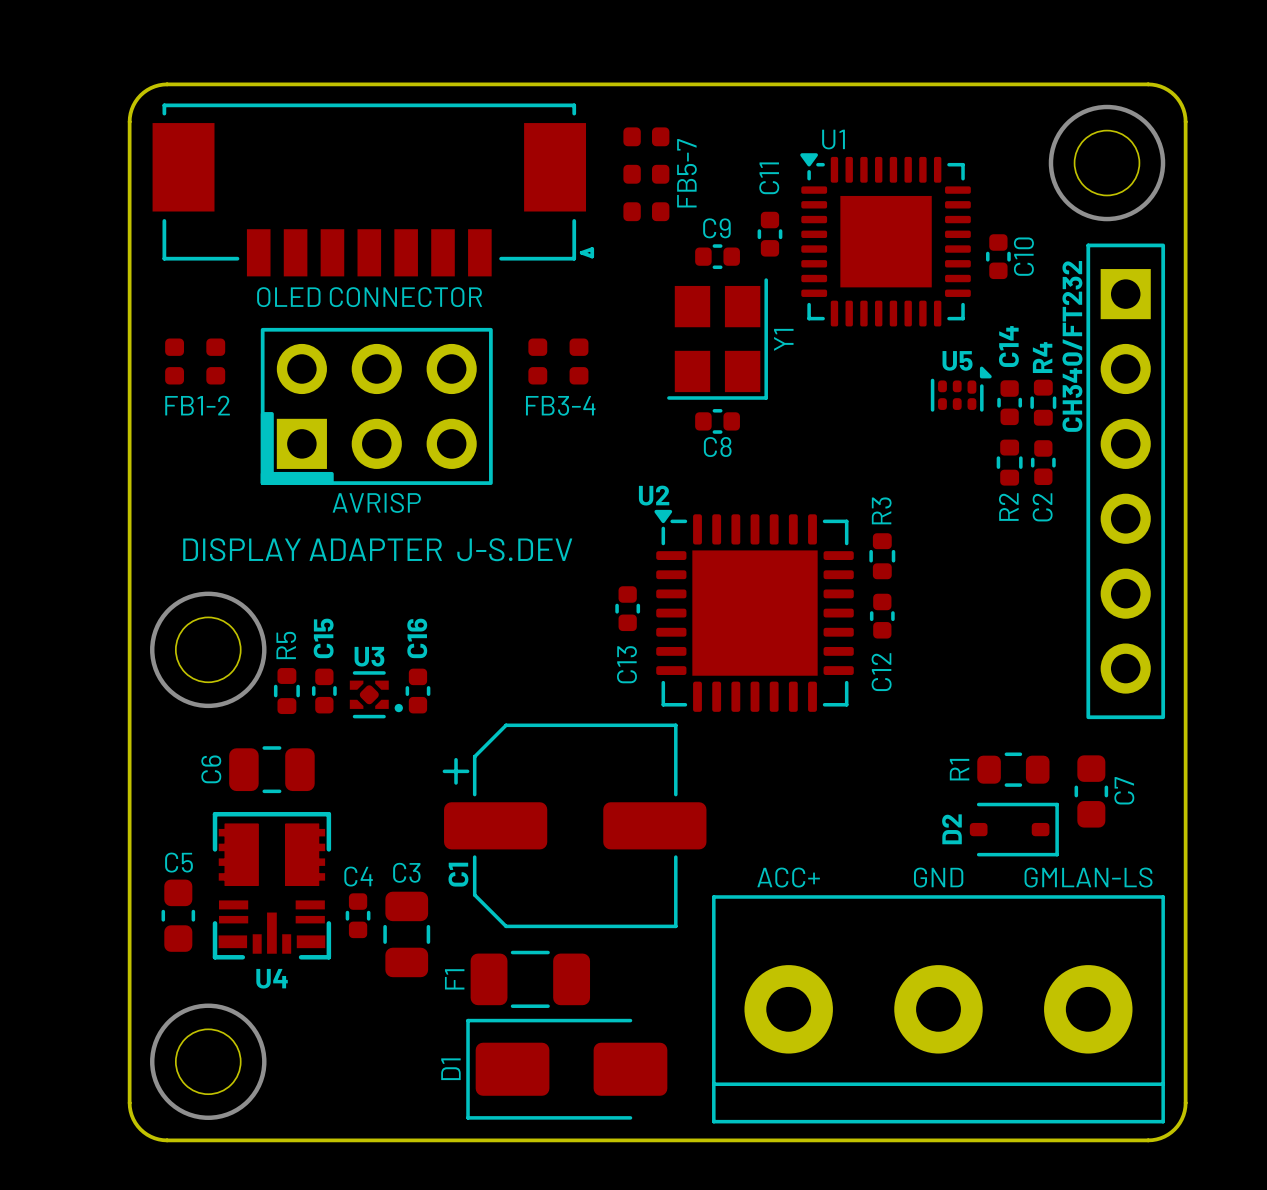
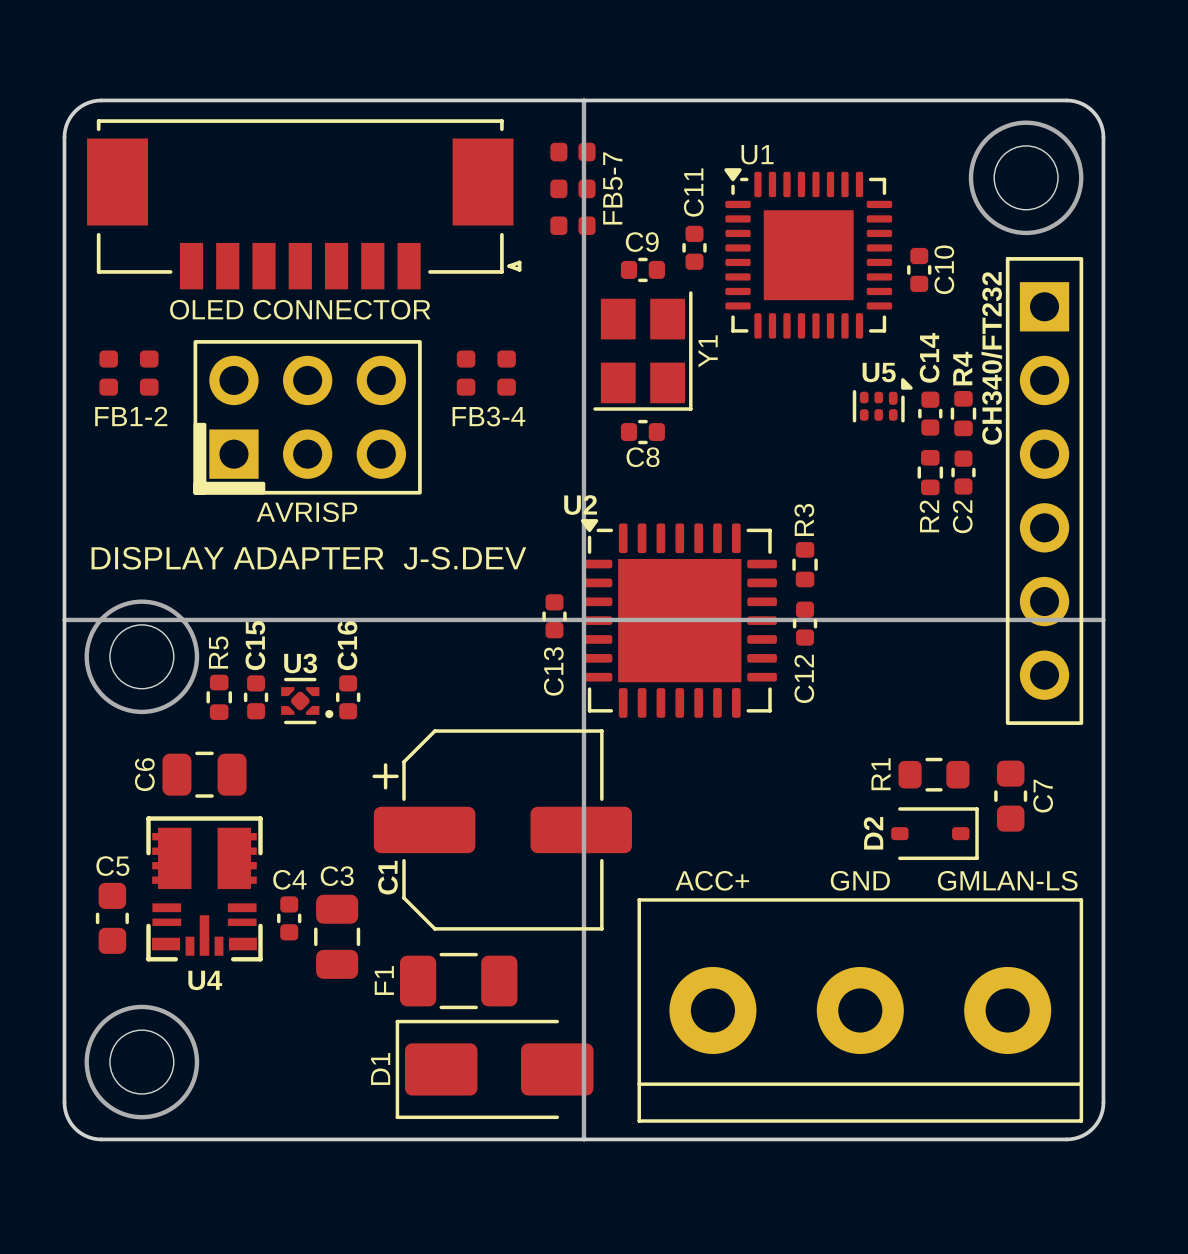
line: none -> (583, 100) (583, 1139)
line: none -> (64, 619) (1103, 619)

